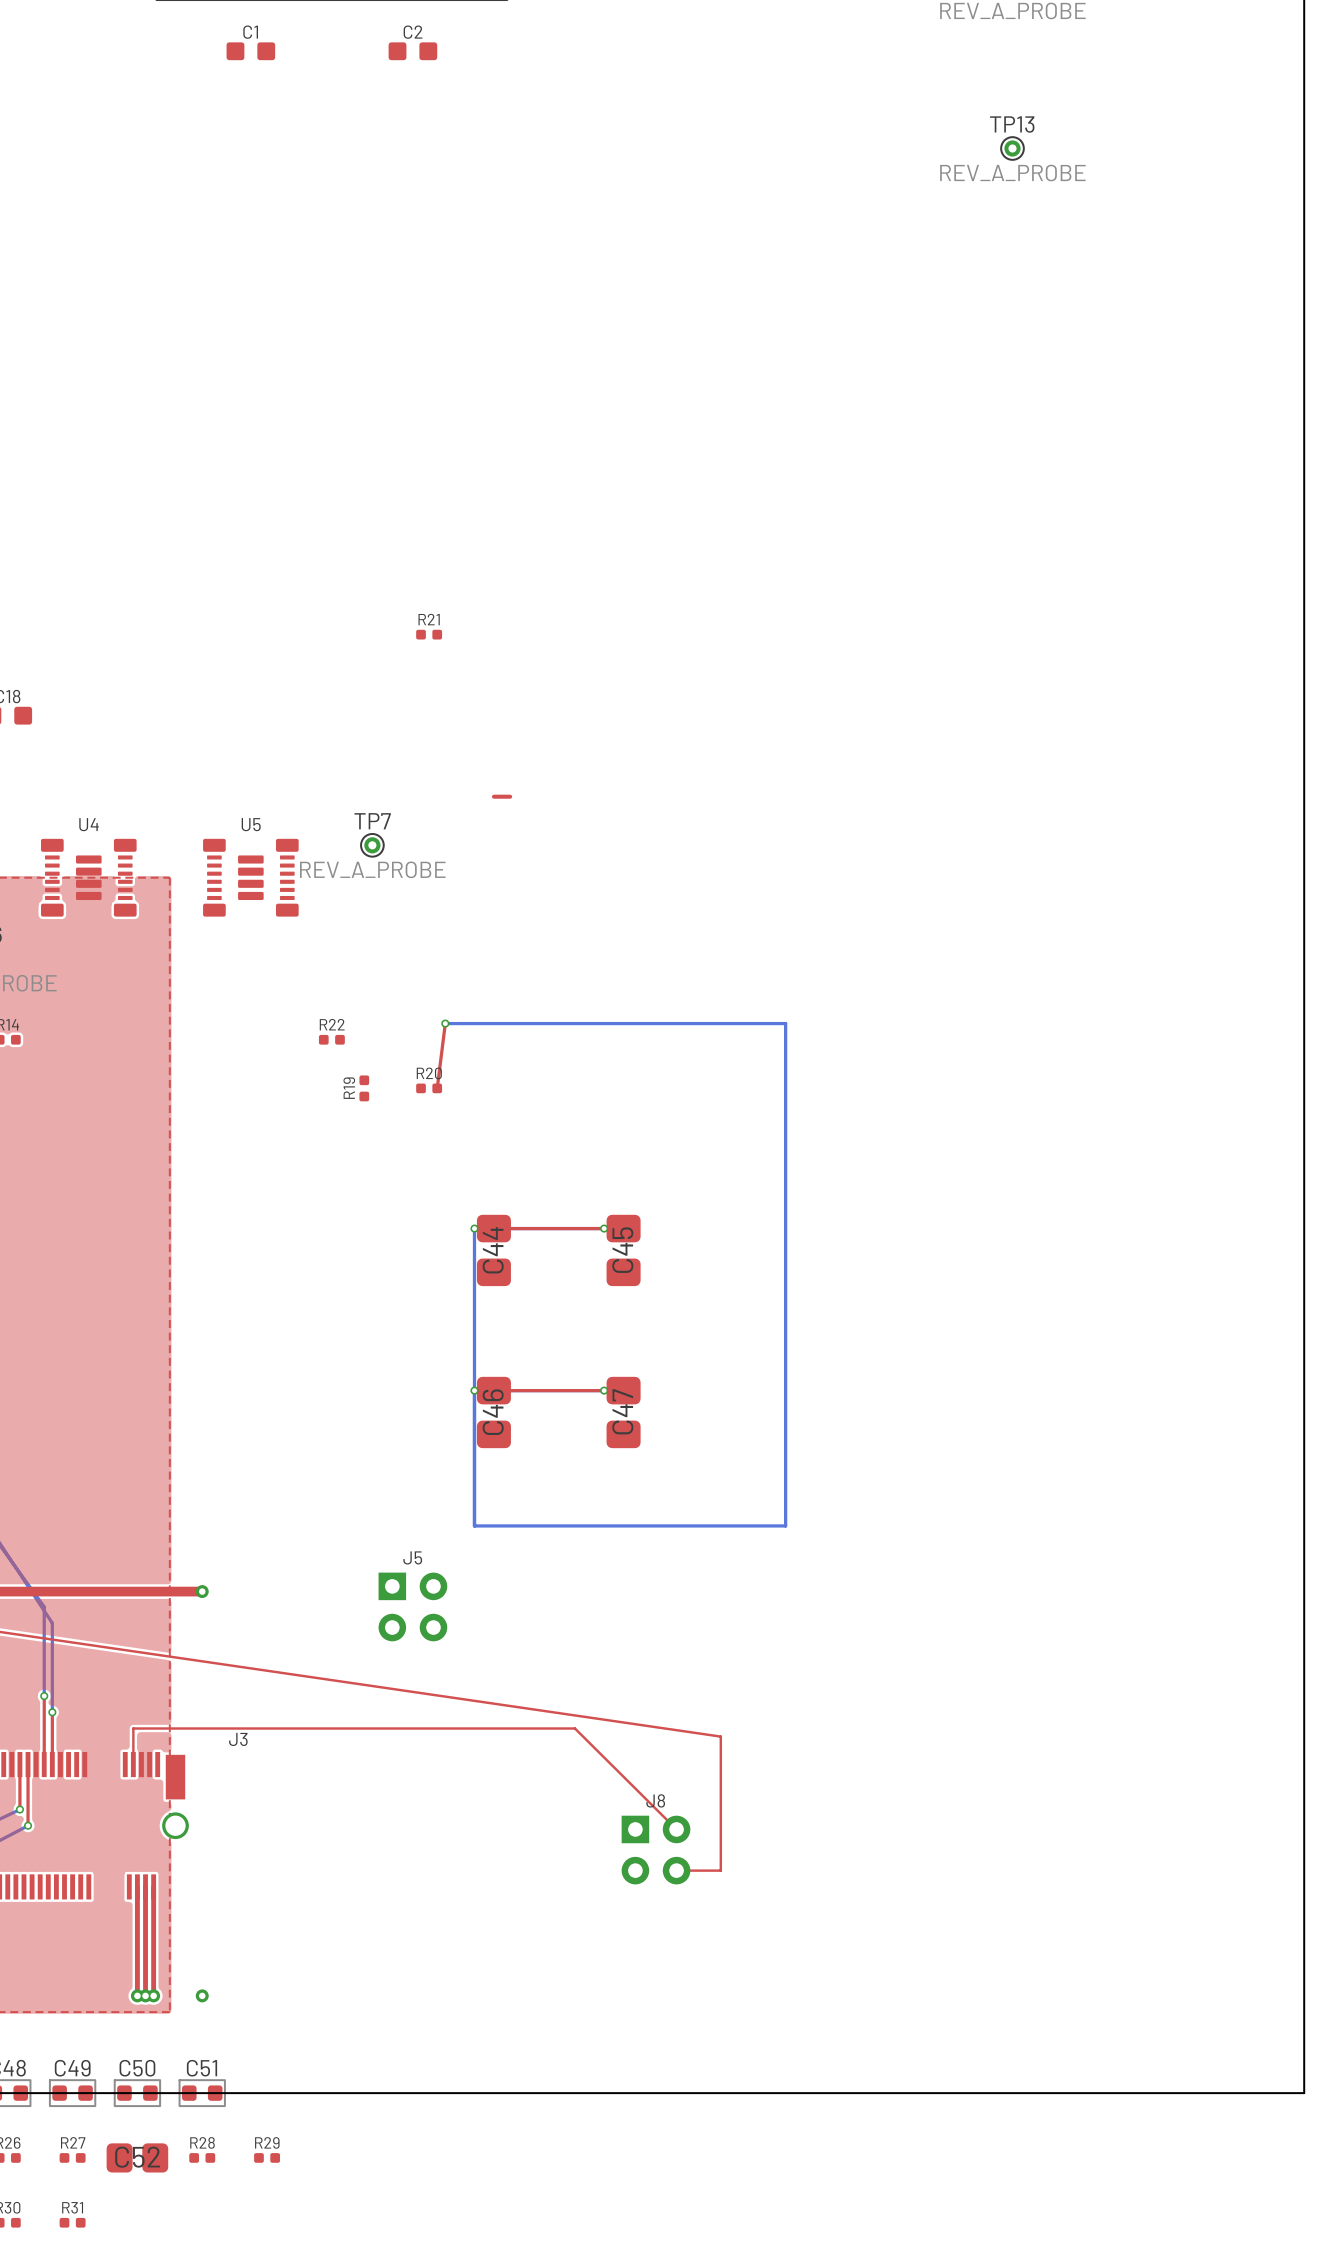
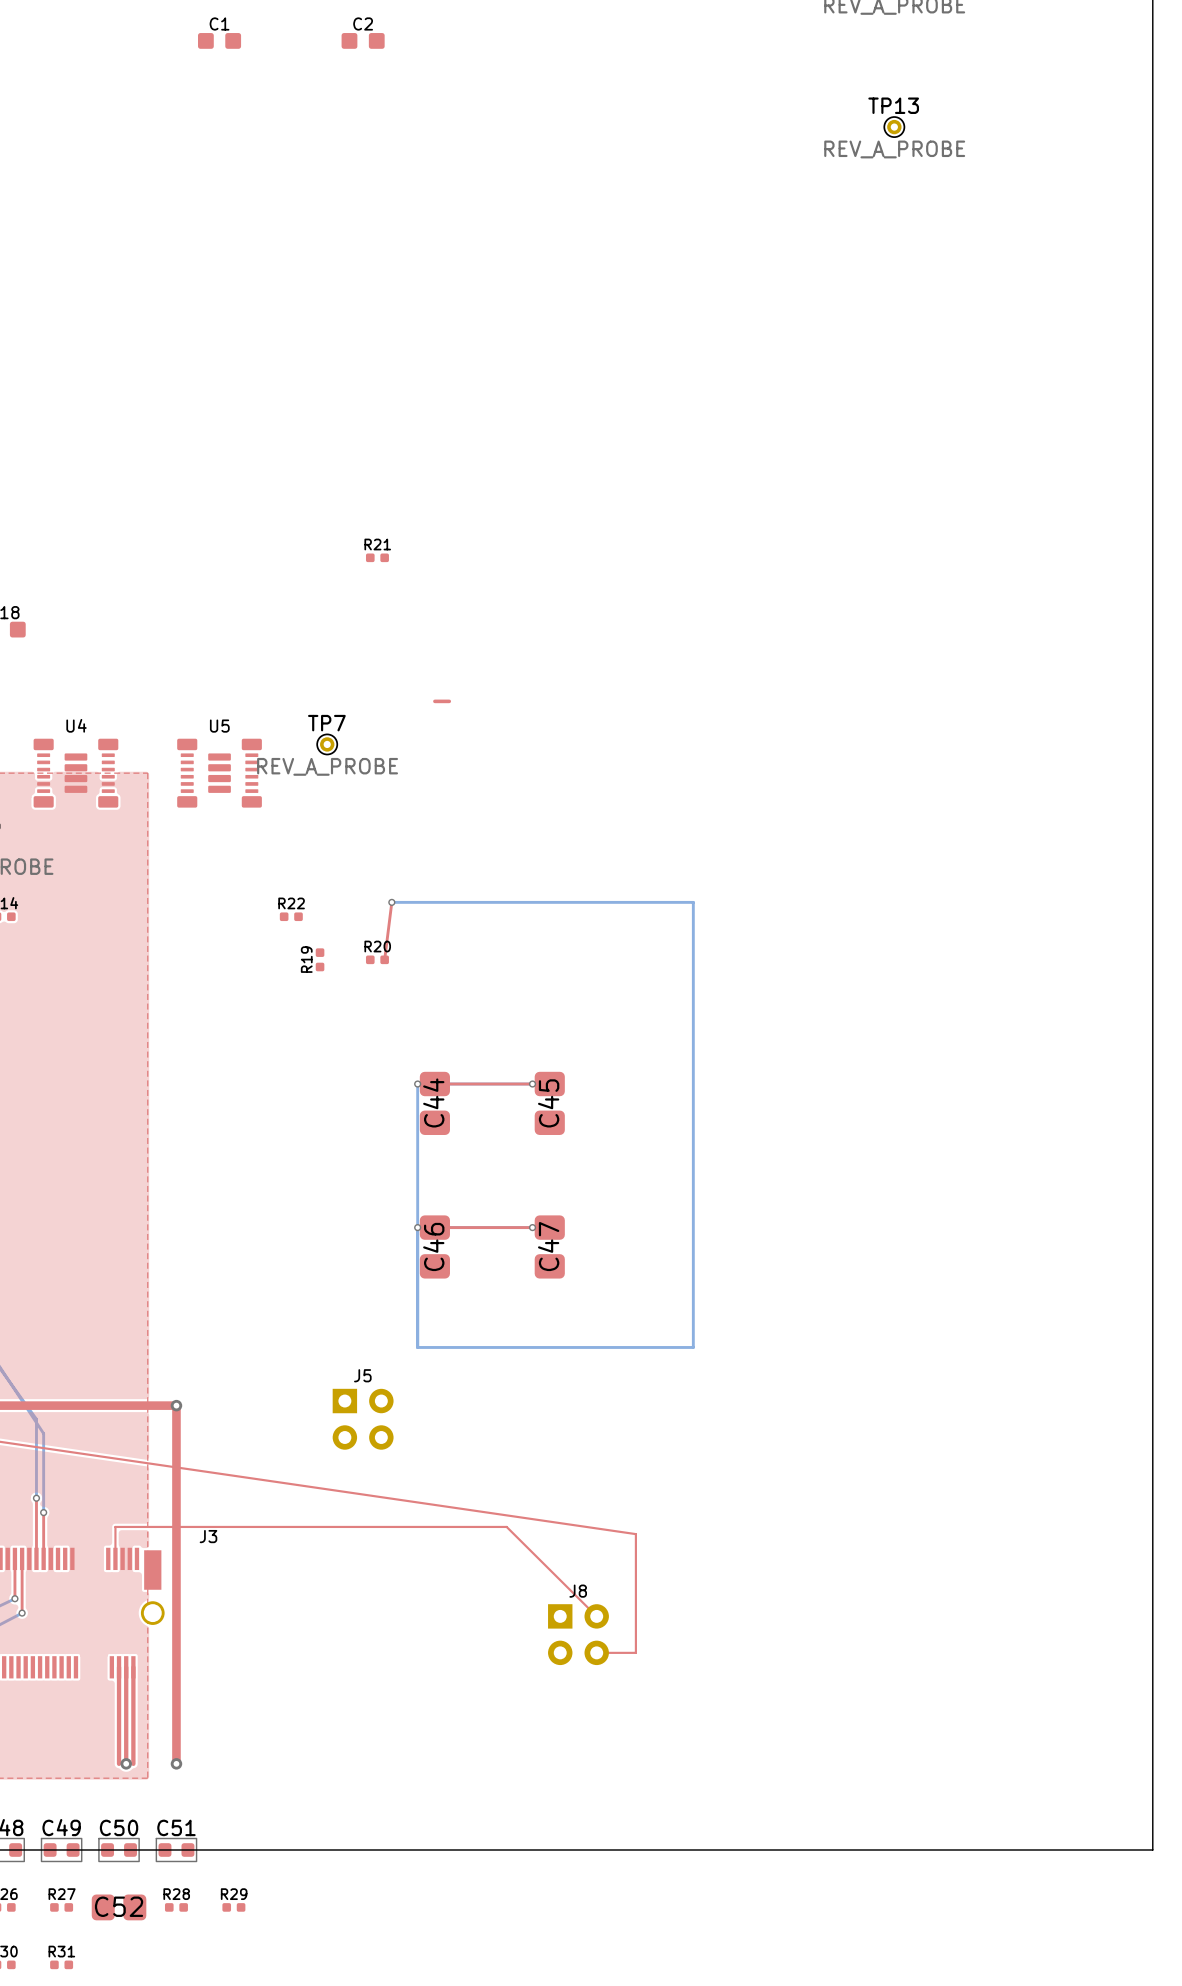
top track: none -> (176, 1405) (176, 1763)
via: (137, 1995) -> none
via: (153, 1995) -> none

